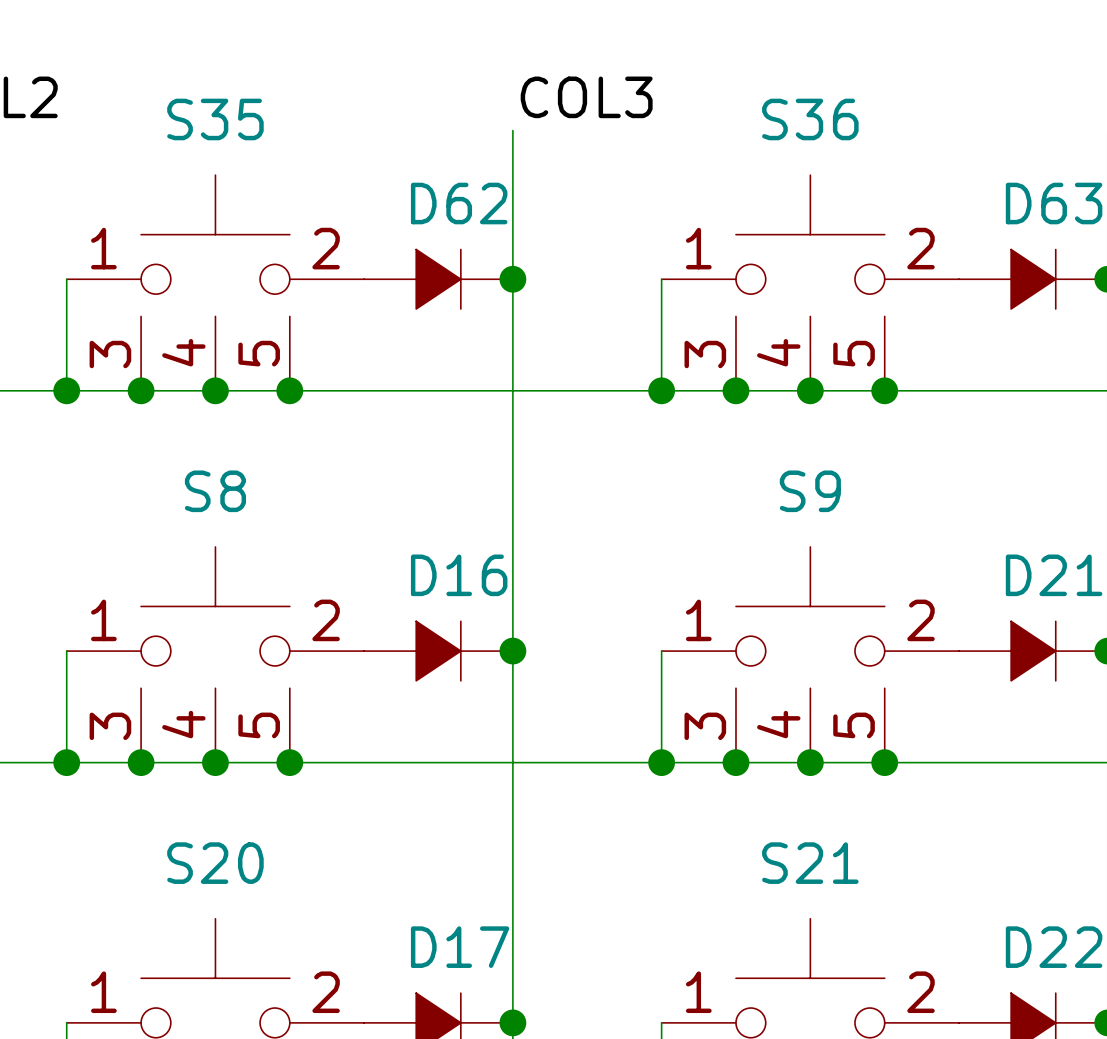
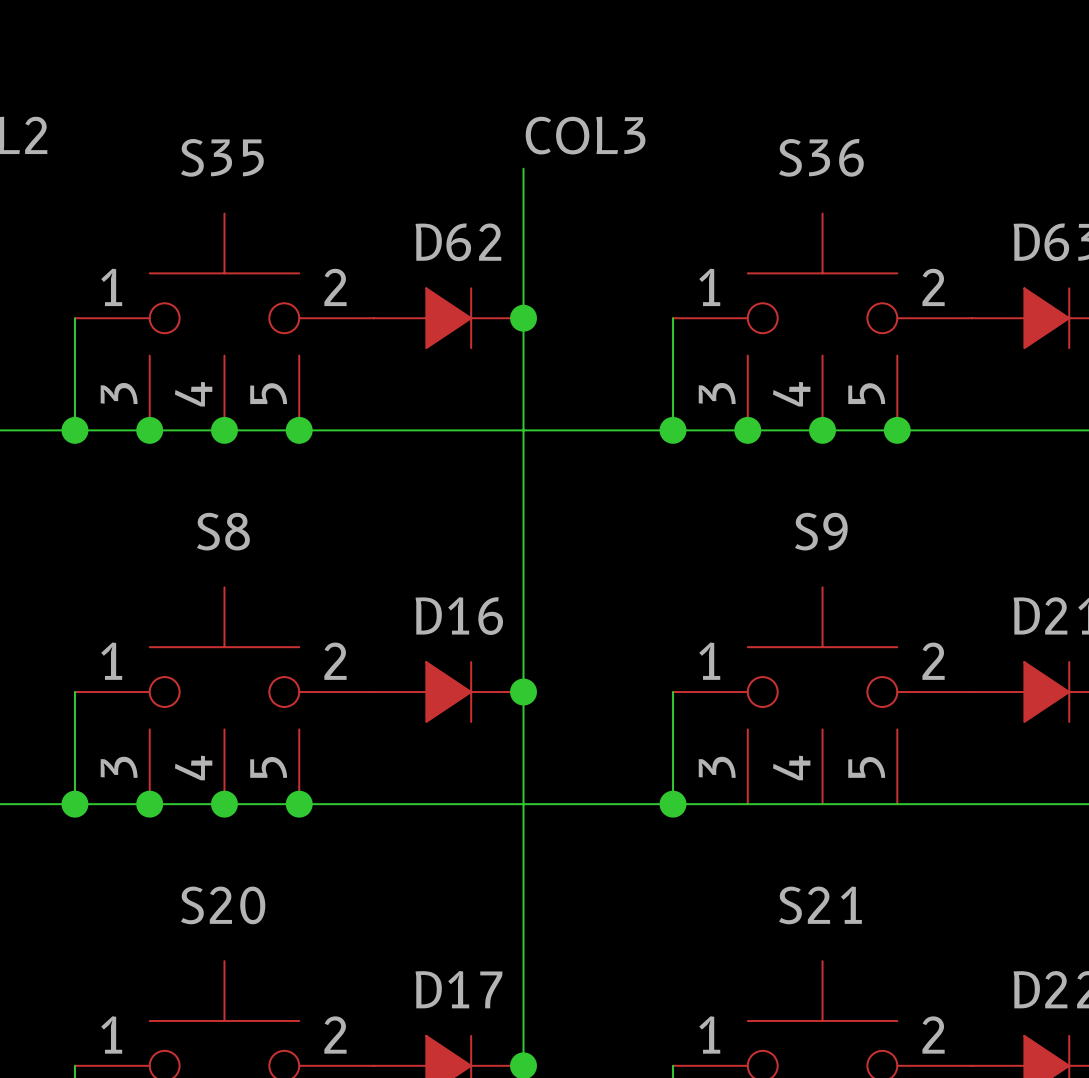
junction: (735, 762) -> none
junction: (810, 762) -> none
junction: (884, 762) -> none

